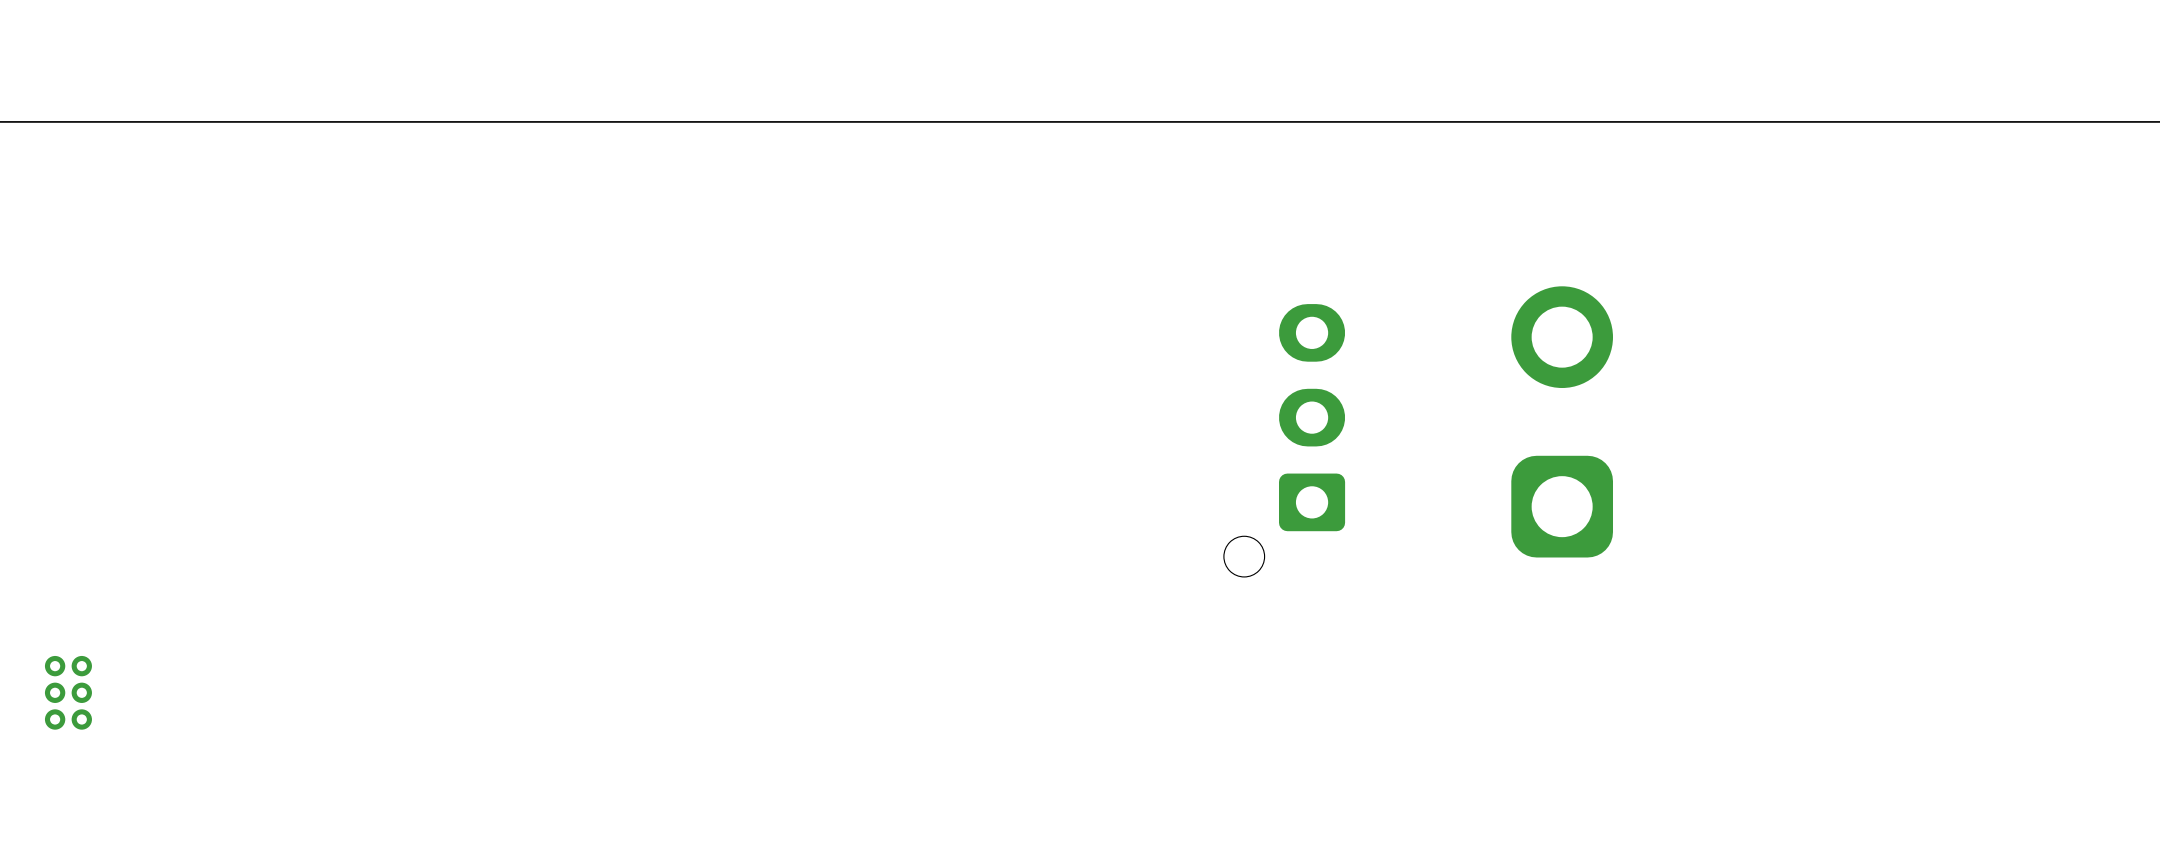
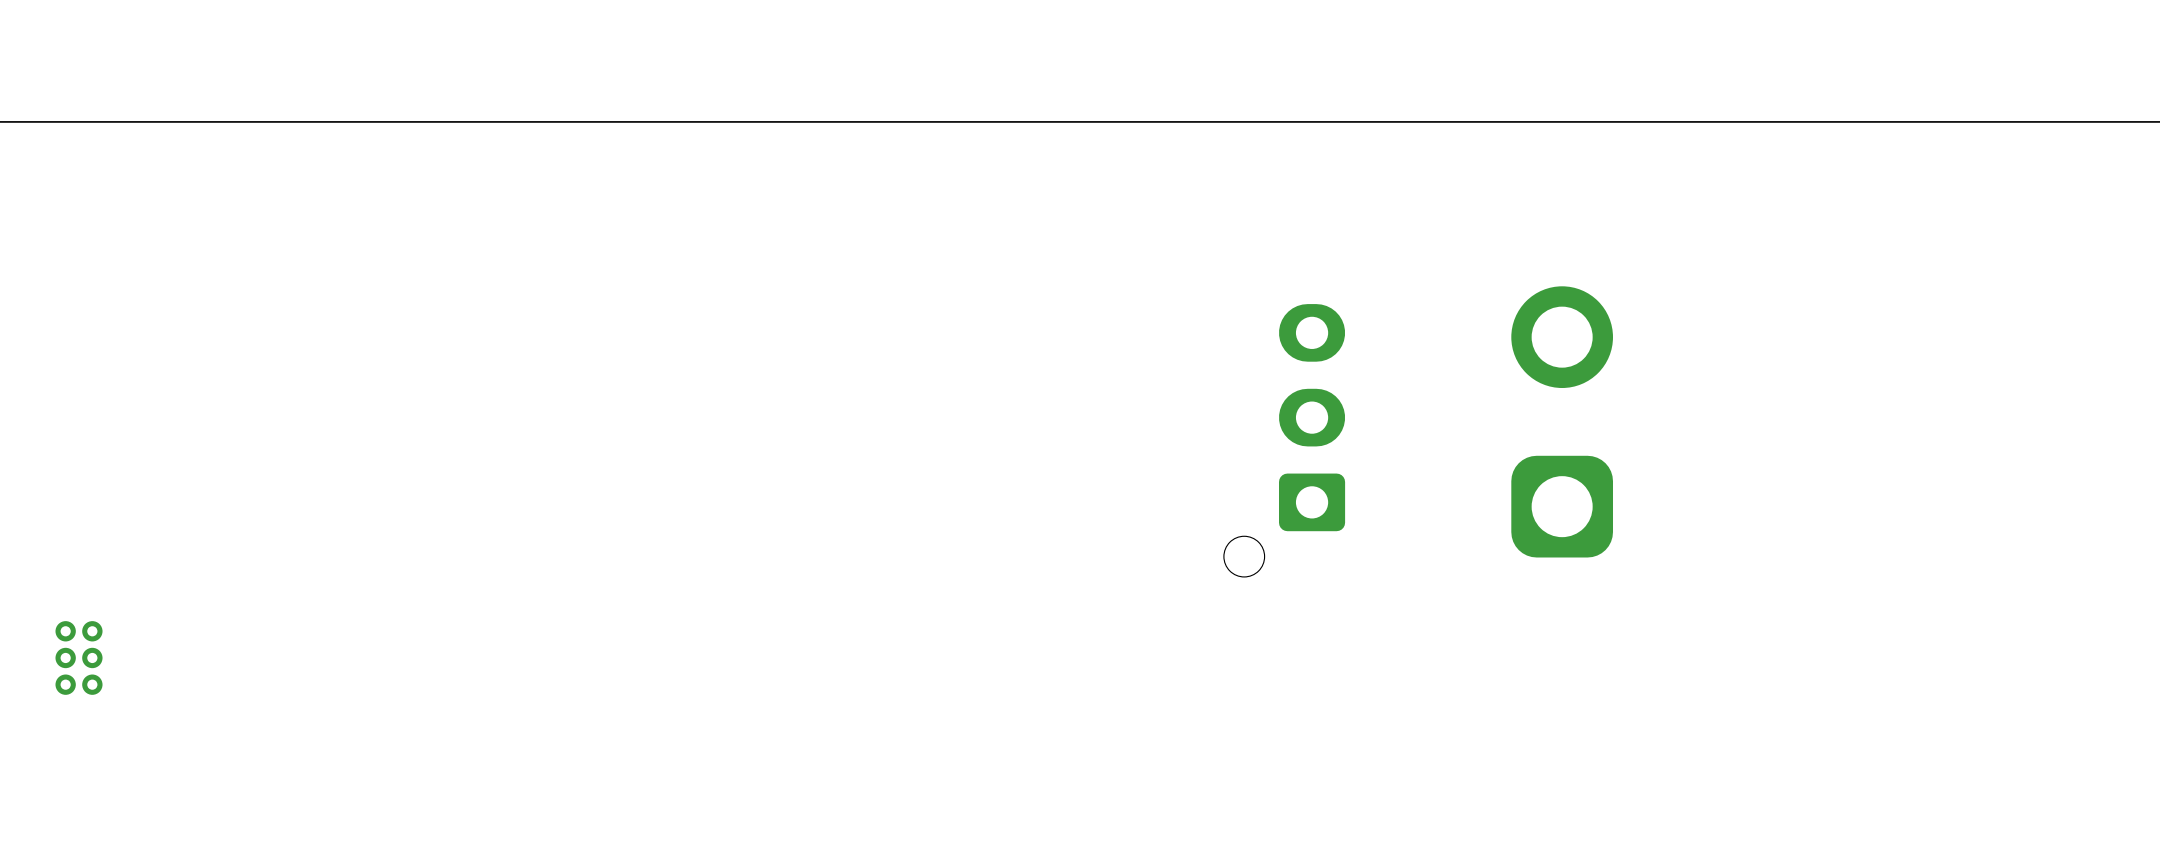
part position: (68, 692) -> (79, 657)

